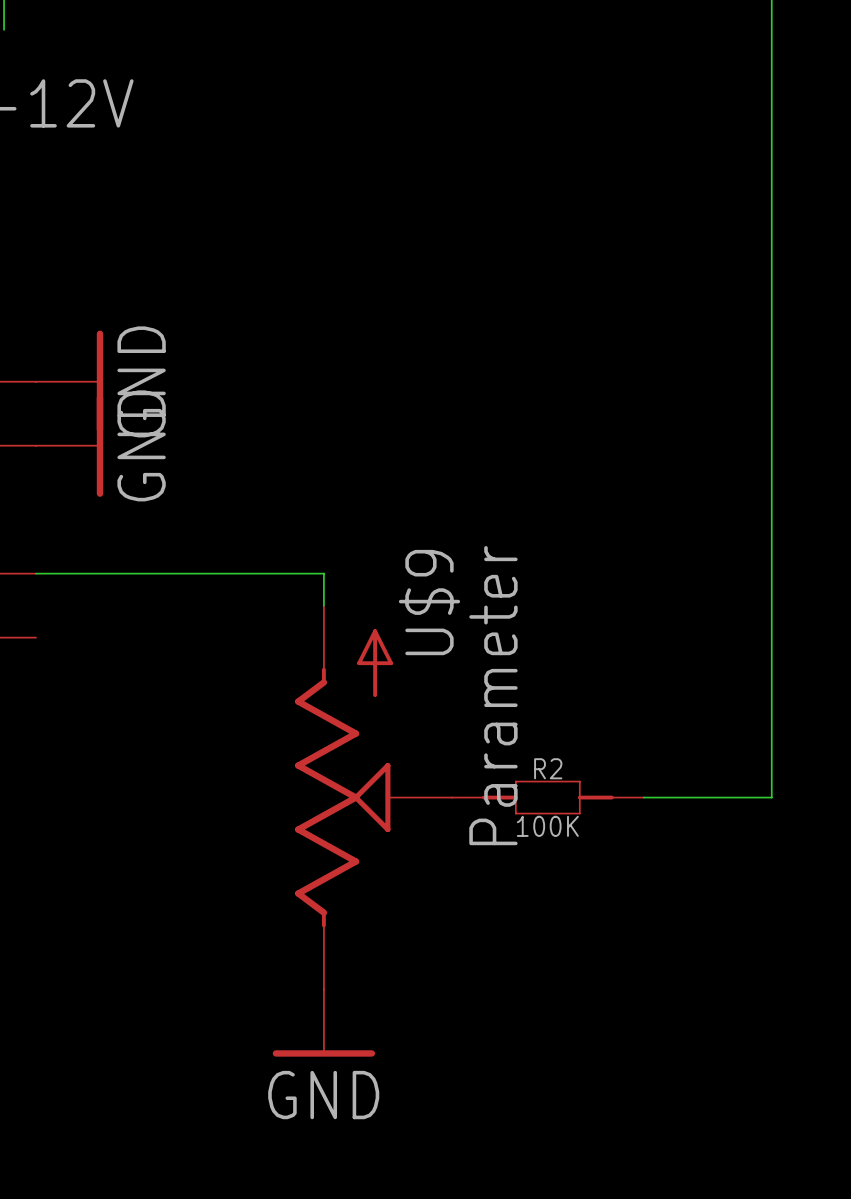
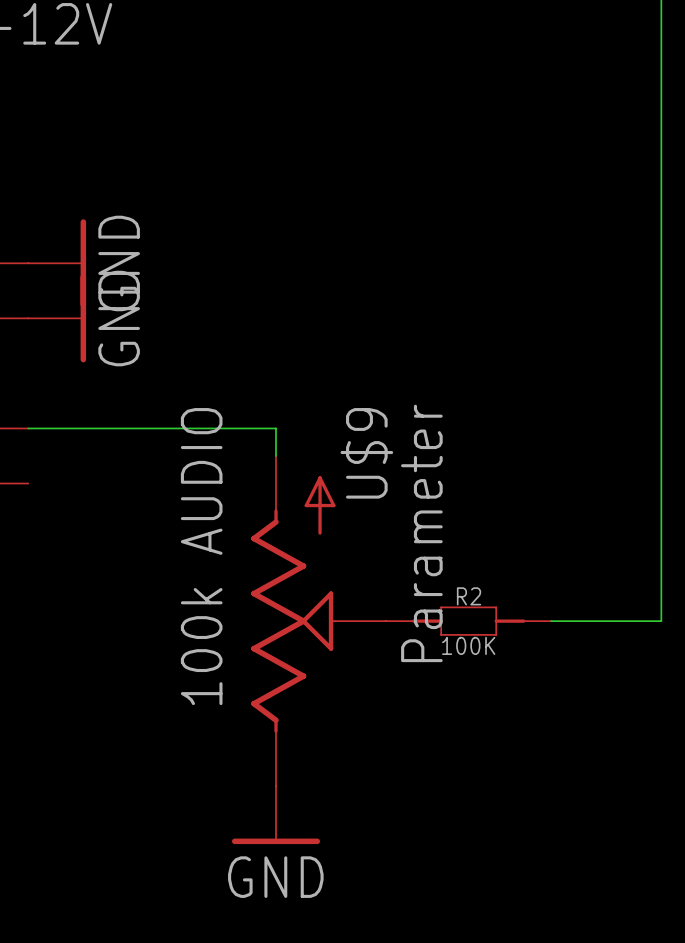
U$9 value: none -> 100k AUDIO (201, 556)

